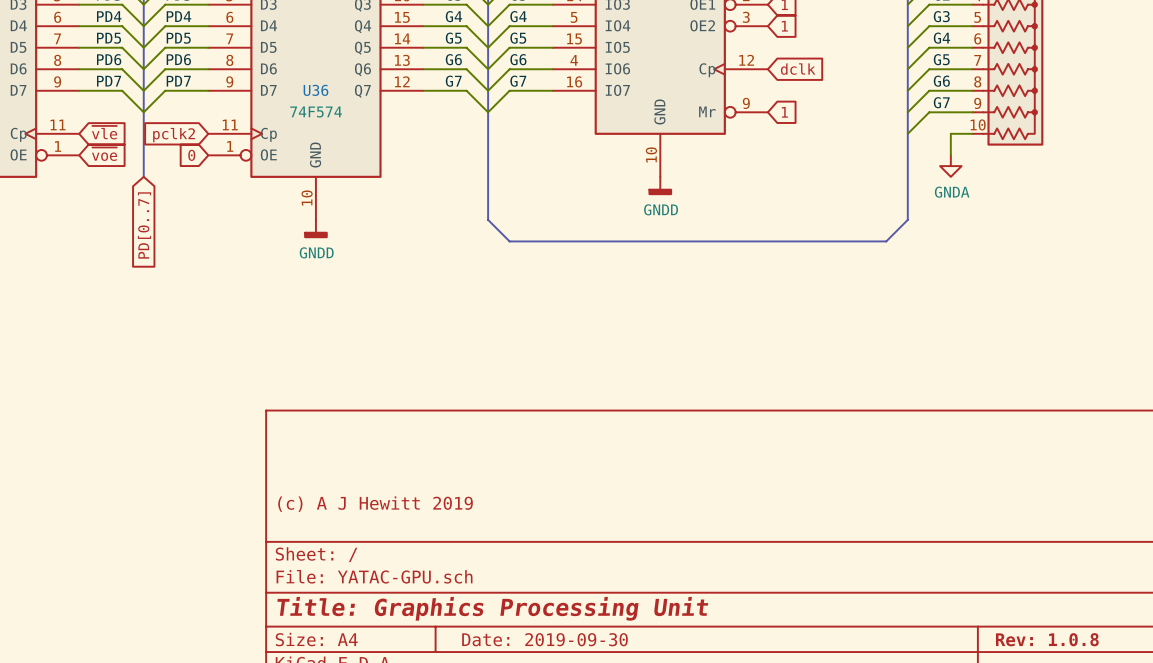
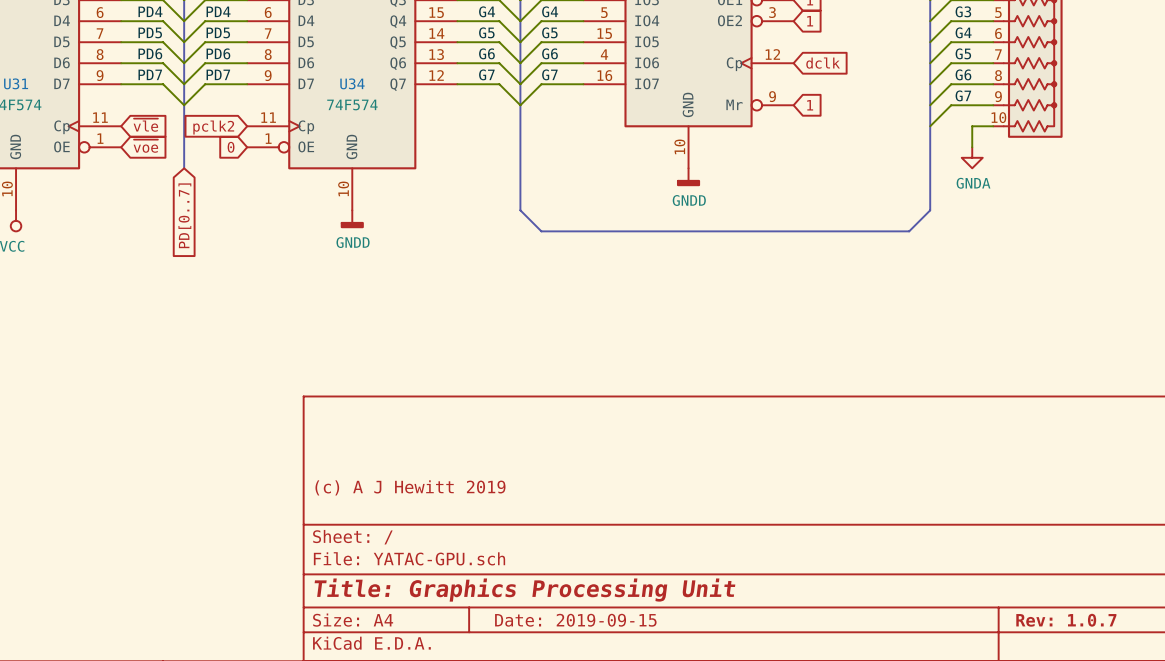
U36 name: U36 (315, 90) -> U34 (352, 83)
title block: Date: 2019-09-30 (545, 639) -> Date: 2019-09-15 (575, 620)
title block: Rev: 1.0.8 (1047, 639) -> Rev: 1.0.7 (1066, 620)

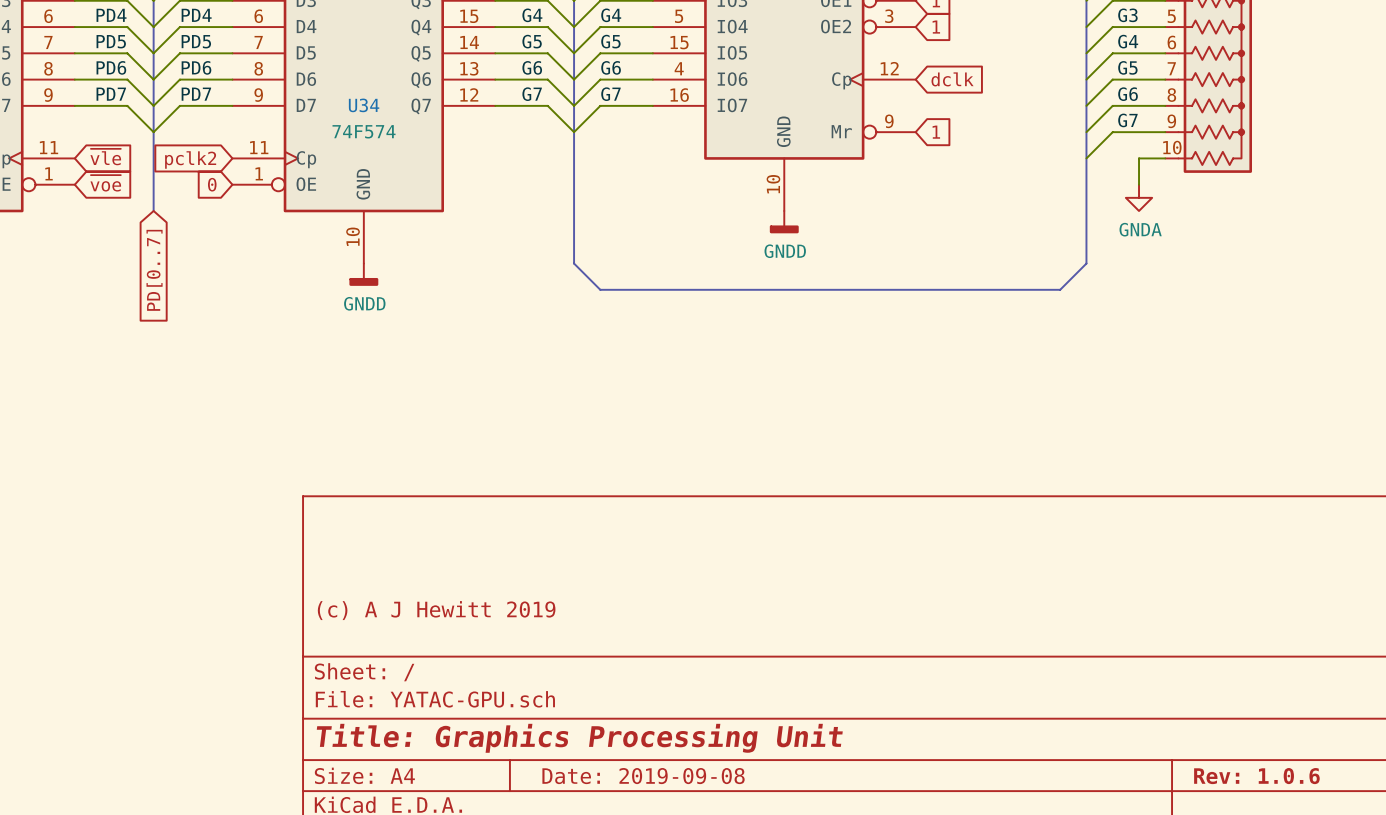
title block: Date: 2019-09-15 (575, 620) -> Date: 2019-09-08 (643, 776)
title block: Rev: 1.0.7 (1066, 620) -> Rev: 1.0.6 (1256, 776)

